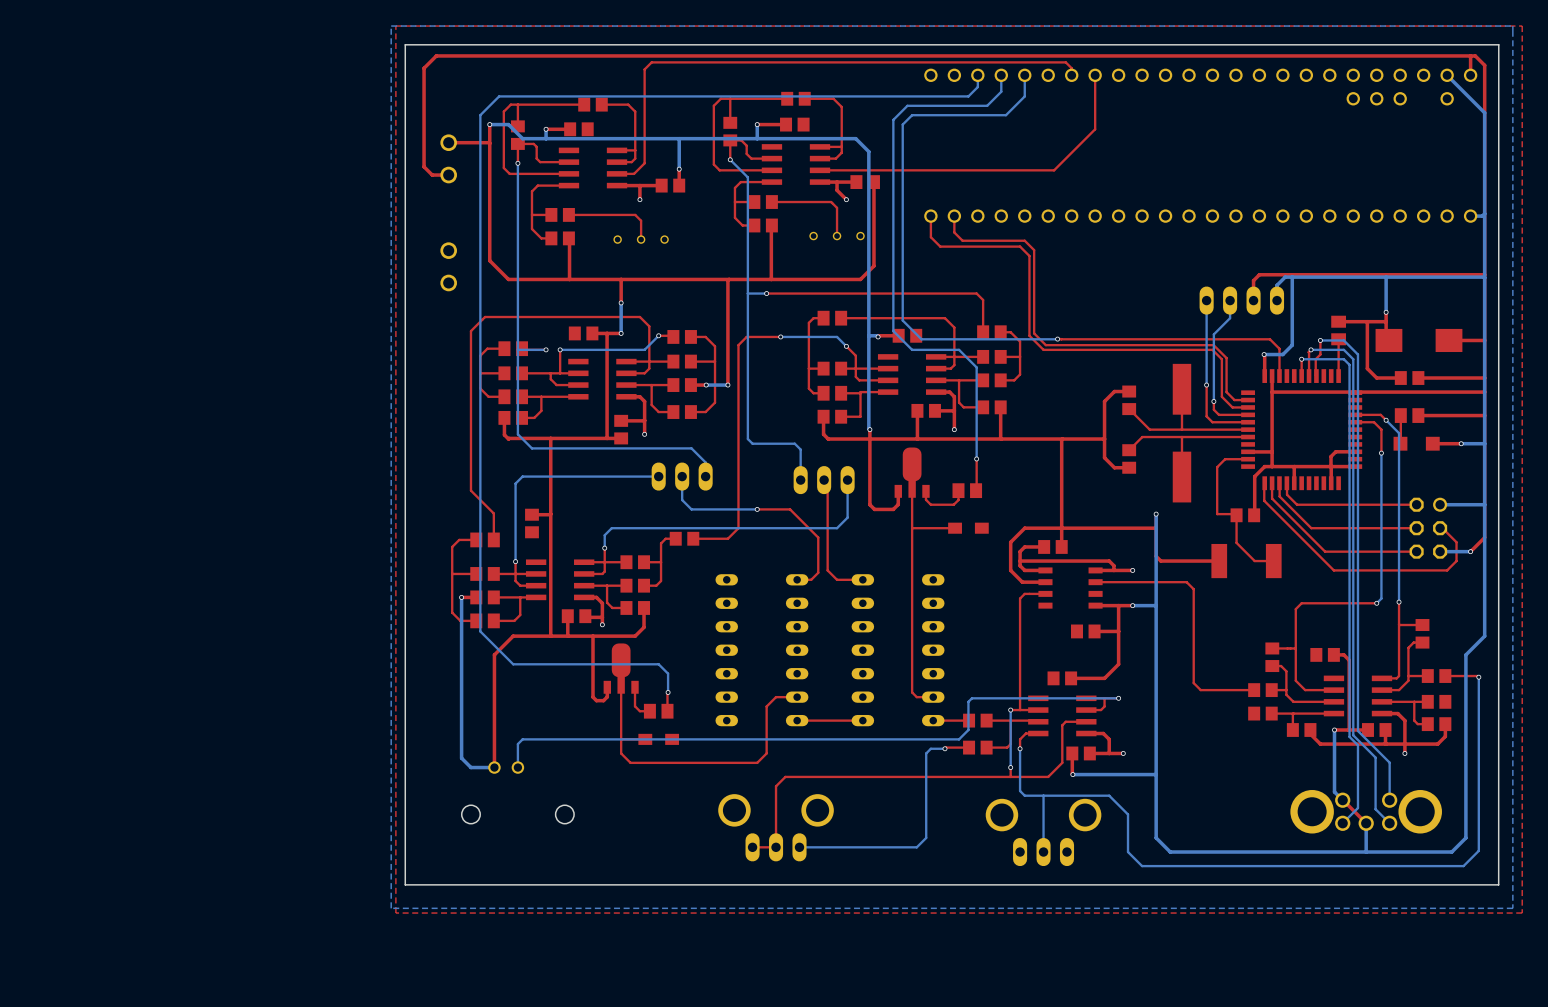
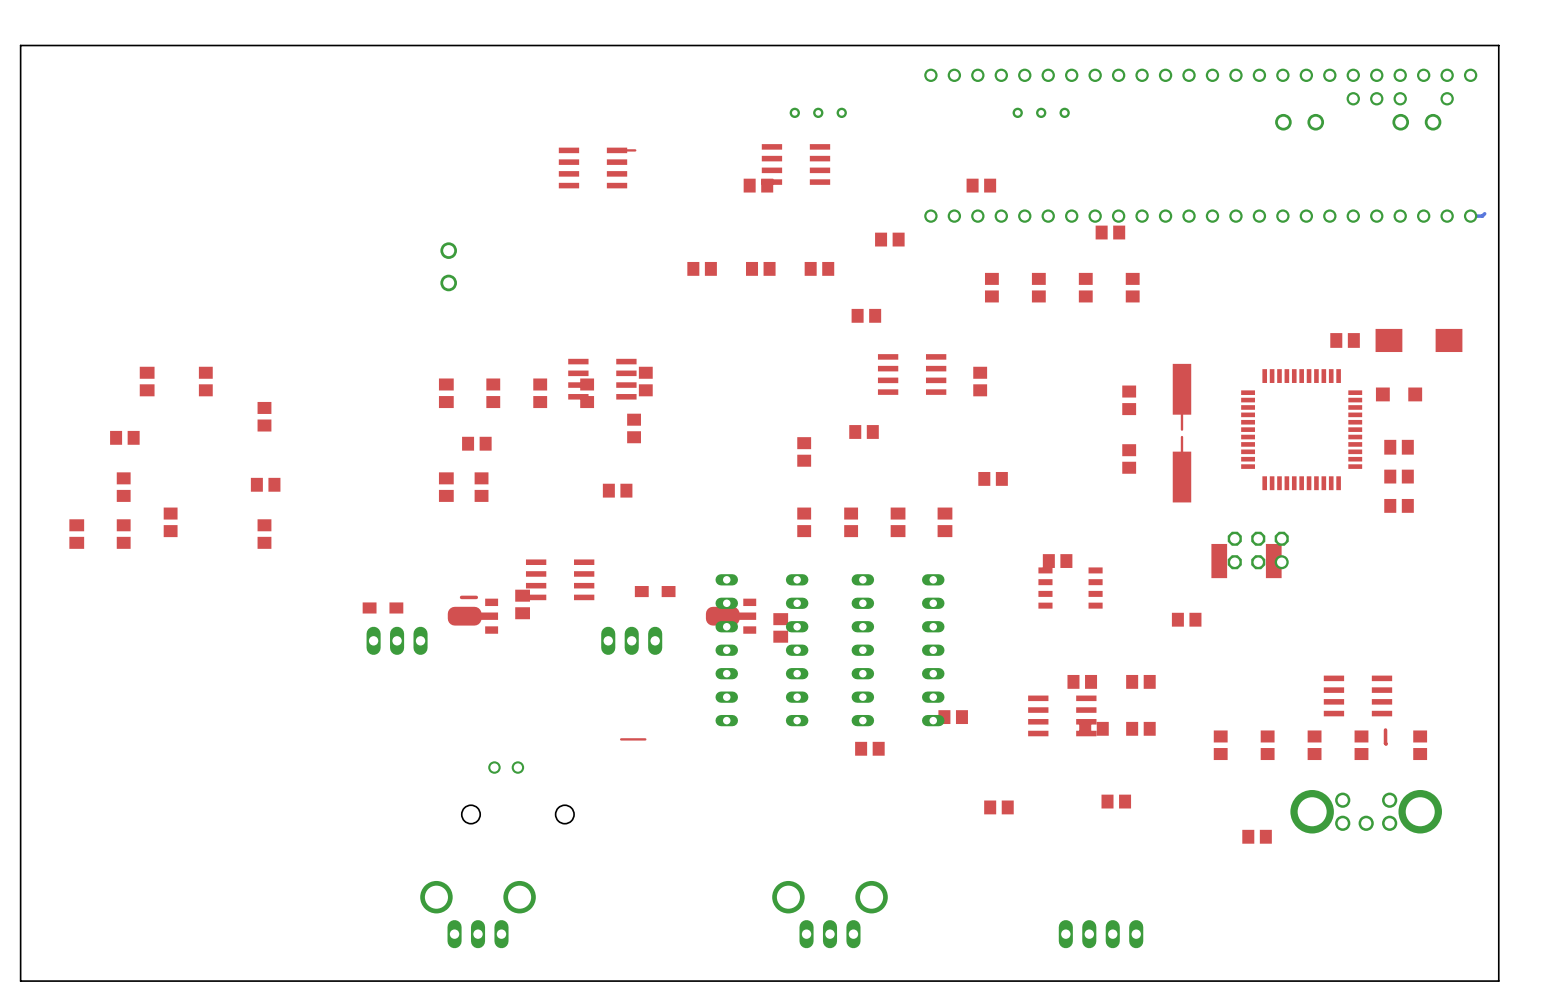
bottom zone outline: (1512, 26) (1512, 908) (391, 908) (391, 26) (1512, 26) -> none
top zone outline: (1522, 26) (395, 26) (395, 913) (1522, 913) (1522, 26) -> none
board edge: (1498, 44) (405, 44) (405, 884) (1498, 884) (1498, 44) -> (1498, 45) (1498, 981) (20, 981) (20, 45) (1498, 45)
top track: (1470, 55) (1470, 75) -> none
bottom track: (977, 75) (977, 87) (968, 96) (499, 96) (480, 115) (480, 631) (513, 664) (658, 664) (668, 673) (668, 692) -> none
bottom track: (1001, 75) (1001, 91) (987, 105) (907, 105) (893, 119) (893, 331) (912, 349) (959, 349) (976, 367) (976, 458) -> none
bottom track: (1024, 75) (1024, 96) (1005, 115) (912, 115) (902, 124) (902, 320) (921, 339) (1057, 339) -> none
top track: (1071, 75) (1071, 68) (1065, 62) (651, 62) (644, 69) (644, 163) (634, 173) (617, 173) -> none
top track: (1095, 75) (1095, 129) (1054, 170) (819, 170) -> none
bottom track: (1447, 75) (1484, 112) (1484, 636) (1465, 654) (1465, 837) (1451, 852) (1170, 852) (1156, 837) (1156, 514) -> none
top track: (730, 98) (730, 122) -> none
top track: (787, 98) (720, 98) (713, 105) (713, 164) (719, 170) (771, 170) -> none
part: (795, 98) -> none
top track: (804, 98) (833, 98) (841, 106) (841, 152) (835, 158) (819, 158) -> none
top track: (517, 104) (517, 126) -> none
top track: (584, 104) (510, 104) (503, 111) (503, 168) (509, 173) (568, 173) -> none
part: (593, 104) -> none
top track: (601, 104) (628, 104) (635, 111) (635, 158) (631, 162) (617, 162) -> none
part: none -> (818, 112)
part: none -> (1041, 112)
part: none -> (1299, 122)
part: none -> (1416, 122)
top track: (489, 124) (489, 260) (508, 279) (860, 279) (873, 265) (873, 182) -> none
bottom track: (489, 124) (508, 124) (522, 138) (855, 138) (868, 151) (869, 429) -> none
via: (489, 124) -> none
bottom track: (757, 124) (757, 138) -> none
via: (757, 124) -> none
top track: (786, 124) (757, 124) -> none
part: (794, 124) -> none
bottom track: (546, 129) (546, 138) -> none
via: (546, 129) -> none
top track: (570, 129) (546, 129) -> none
part: (578, 129) -> none
part: (730, 131) -> none
part: (517, 135) -> none
bottom track: (679, 138) (679, 169) -> none
top track: (448, 142) (489, 143) -> none
top track: (841, 146) (819, 146) -> none
part: (448, 158) -> none
top track: (771, 158) (751, 158) (746, 153) (746, 145) (741, 140) (730, 140) (730, 159) -> none
bottom track: (730, 159) (747, 177) (747, 439) (752, 443) (794, 443) (800, 449) (800, 480) -> none
via: (730, 159) -> none
top track: (568, 162) (540, 162) (536, 158) (536, 146) (533, 143) (517, 143) (517, 163) -> none
bottom track: (517, 163) (517, 434) (531, 448) (691, 448) (705, 462) (705, 476) -> none
via: (517, 163) -> none
top track: (679, 169) (679, 185) -> none
via: (679, 169) -> none
top track: (448, 175) (432, 175) (424, 166) (424, 68) (436, 55) (1475, 55) (1484, 65) (1484, 537) (1470, 551) -> none
top track: (771, 182) (740, 182) (734, 187) (734, 217) (742, 225) (754, 225) -> none
top track: (837, 182) (837, 190) (846, 199) -> none
top track: (856, 182) (819, 182) -> none
part: (865, 182) -> none
top track: (568, 185) (537, 185) (531, 191) (531, 229) (541, 238) (551, 238) -> none
top track: (639, 185) (639, 199) -> none
top track: (661, 185) (617, 185) -> none
part: (670, 185) -> none
part: none -> (981, 185)
via: (639, 199) -> none
via: (846, 199) -> none
top track: (754, 202) (734, 202) -> none
part position: (763, 202) -> (758, 185)
top track: (771, 202) (831, 202) (837, 207) (837, 236) -> none
top track: (551, 214) (531, 214) -> none
part: (560, 214) -> none
top track: (568, 214) (635, 214) (641, 220) (641, 239) -> none
top track: (930, 216) (930, 237) (940, 246) (1020, 246) (1029, 255) (1029, 335) (1043, 349) (1212, 349) (1221, 359) (1221, 396) (1232, 407) (1248, 407) -> none
top track: (954, 216) (954, 232) (962, 240) (1024, 240) (1034, 250) (1034, 333) (1045, 345) (1213, 345) (1226, 358) (1226, 392) (1234, 400) (1248, 400) -> none
part: (763, 225) -> none
top track: (771, 225) (771, 279) -> none
part: none -> (1110, 232)
part: (837, 236) -> none
part: (560, 238) -> none
top track: (568, 238) (569, 279) -> none
part: (641, 239) -> none
part: none -> (889, 239)
part: none -> (702, 268)
part: none -> (760, 268)
part: none -> (819, 268)
top track: (1484, 274) (1259, 274) (1253, 280) (1253, 300) -> none
bottom track: (1292, 277) (1292, 345) (1282, 354) (1264, 354) -> none
bottom track: (1386, 277) (1386, 312) -> none
bottom track: (1484, 277) (1285, 277) (1277, 285) (1277, 300) -> none
top track: (621, 279) (621, 302) -> none
top track: (729, 279) (727, 385) -> none
part: none -> (991, 287)
part: none -> (1038, 287)
part: none -> (1085, 287)
part: none -> (1132, 287)
top track: (766, 293) (976, 293) (983, 300) (983, 332) -> none
bottom track: (766, 293) (747, 293) -> none
via: (766, 293) -> none
bottom track: (1206, 300) (1206, 385) -> none
bottom track: (1230, 300) (1230, 318) (1213, 334) (1213, 401) -> none
part: (1241, 300) -> none
bottom track: (621, 302) (621, 333) -> none
via: (621, 302) -> none
top track: (1386, 312) (1386, 337) (1388, 340) -> none
via: (1386, 312) -> none
part: none -> (866, 315)
top track: (823, 318) (813, 318) (808, 322) (808, 388) (813, 393) (823, 393) -> none
part: (832, 318) -> none
top track: (841, 318) (944, 318) (954, 327) (954, 365) (950, 368) (936, 368) -> none
top track: (1367, 321) (1367, 368) (1376, 378) (1400, 378) -> none
top track: (1386, 321) (1338, 321) -> none
part rotation: 0° (1338, 330) -> 90° clockwise (1345, 340)
part: (991, 332) -> none
top track: (1000, 332) (1010, 332) (1020, 341) (1020, 374) (1014, 380) (1000, 380) -> none
part: (583, 333) -> none
top track: (607, 333) (607, 438) -> none
top track: (621, 333) (592, 333) -> none
via: (621, 333) -> none
top track: (658, 335) (673, 336) -> none
bottom track: (658, 335) (644, 349) (560, 349) -> none
via: (658, 335) -> none
bottom track: (868, 335) (878, 336) -> none
top track: (898, 335) (878, 336) -> none
part: (907, 335) -> none
part: (682, 336) -> none
top track: (690, 336) (705, 336) (715, 346) (715, 402) (705, 412) (690, 412) -> none
top track: (780, 336) (746, 336) (738, 345) (738, 528) (727, 538) (693, 538) -> none
bottom track: (780, 336) (837, 336) (846, 346) -> none
via: (780, 336) -> none
via: (878, 336) -> none
top track: (1057, 339) (1269, 339) (1279, 348) (1279, 376) -> none
via: (1057, 339) -> none
top track: (1338, 339) (1338, 376) -> none
top track: (1320, 340) (1320, 354) (1315, 359) (1316, 376) -> none
bottom track: (1320, 340) (1343, 340) (1357, 354) (1357, 730) (1389, 762) (1389, 800) -> none
via: (1320, 340) -> none
top track: (1484, 340) (1449, 340) -> none
top track: (846, 346) (855, 355) (855, 376) (859, 380) (888, 380) -> none
via: (846, 346) -> none
top track: (504, 348) (487, 348) (480, 355) (480, 388) (488, 396) (504, 396) -> none
part: (513, 348) -> none
bottom track: (546, 349) (517, 349) -> none
via: (546, 349) -> none
top track: (560, 349) (560, 373) -> none
via: (560, 349) -> none
top track: (1311, 349) (1308, 352) (1309, 376) -> none
bottom track: (1311, 349) (1343, 349) (1353, 359) (1353, 735) (1375, 757) (1375, 809) (1389, 823) -> none
via: (1311, 349) -> none
top track: (1264, 354) (1264, 376) -> none
via: (1264, 354) -> none
top track: (983, 356) (936, 356) -> none
part: (991, 356) -> none
top track: (1020, 356) (1000, 356) -> none
top track: (1301, 359) (1301, 376) -> none
bottom track: (1301, 359) (1343, 359) (1349, 364) (1349, 736) (1357, 745) (1357, 808) (1342, 823) -> none
via: (1301, 359) -> none
top track: (673, 361) (626, 361) -> none
part: (682, 361) -> none
top track: (715, 361) (690, 361) -> none
top track: (823, 368) (808, 368) -> none
part: (832, 368) -> none
top track: (888, 368) (841, 368) -> none
top track: (504, 373) (480, 373) -> none
part: (513, 373) -> none
top track: (550, 373) (550, 379) (556, 385) (578, 385) -> none
top track: (578, 373) (521, 373) -> none
top track: (626, 373) (644, 373) (649, 368) (649, 326) (639, 317) (485, 317) (470, 331) (470, 490) (493, 513) (493, 539) -> none
top track: (1272, 376) (1272, 466) -> none
part: (1409, 378) -> none
top track: (1484, 378) (1418, 378) -> none
top track: (959, 380) (959, 402) (963, 407) (983, 407) -> none
top track: (983, 380) (936, 380) -> none
part rotation: 0° (991, 380) -> 90° clockwise (980, 381)
part: none -> (147, 381)
part: none -> (205, 381)
part: none -> (645, 381)
top track: (651, 385) (651, 405) (658, 412) (673, 412) -> none
top track: (673, 385) (626, 385) -> none
part: (682, 385) -> none
top track: (706, 385) (690, 385) -> none
via: (706, 385) -> none
bottom track: (727, 385) (706, 385) -> none
via: (727, 385) -> none
top track: (1206, 385) (1206, 416) (1212, 422) (1248, 422) -> none
via: (1206, 385) -> none
top track: (1129, 391) (1114, 391) (1104, 401) (1104, 457) (1114, 467) (1129, 467) -> none
top track: (888, 392) (860, 392) (860, 416) (841, 416) -> none
top track: (936, 392) (949, 392) (954, 396) (954, 429) -> none
top track: (1484, 392) (1272, 392) -> none
part: none -> (446, 393)
part: none -> (493, 393)
part: none -> (540, 393)
part: none -> (587, 393)
part: (832, 393) -> none
top track: (860, 393) (841, 393) -> none
part: (513, 396) -> none
top track: (541, 396) (541, 410) (534, 417) (521, 417) -> none
top track: (578, 396) (521, 396) -> none
top track: (626, 396) (639, 396) (644, 401) (644, 434) -> none
top track: (1213, 401) (1213, 409) (1218, 414) (1248, 414) -> none
via: (1213, 401) -> none
part: (991, 407) -> none
top track: (1000, 407) (1001, 439) -> none
top track: (1129, 409) (1149, 429) (1248, 429) -> none
top track: (917, 410) (917, 439) -> none
part: (926, 410) -> none
top track: (954, 410) (934, 410) -> none
part: (682, 412) -> none
top track: (1355, 414) (1380, 414) (1386, 420) -> none
top track: (1400, 415) (1400, 443) -> none
part position: (1409, 415) -> (1399, 447)
top track: (1484, 415) (1418, 415) -> none
part: none -> (264, 416)
top track: (823, 416) (823, 434) (828, 439) (1104, 439) -> none
part: (832, 416) -> none
top track: (504, 417) (504, 434) (508, 439) (621, 438) -> none
part: (513, 417) -> none
top track: (644, 420) (621, 420) -> none
bottom track: (1386, 420) (1399, 433) (1399, 602) -> none
via: (1386, 420) -> none
top track: (1355, 422) (1374, 422) (1381, 429) (1381, 453) -> none
part position: (621, 429) -> (634, 428)
top track: (869, 429) (869, 504) (874, 509) (893, 509) (898, 504) (898, 491) -> none
via: (869, 429) -> none
via: (954, 429) -> none
part: none -> (864, 431)
via: (644, 434) -> none
part: none -> (124, 437)
top track: (1248, 437) (1142, 437) (1129, 450) -> none
top track: (550, 438) (550, 636) -> none
top track: (1062, 439) (1061, 546) -> none
part: none -> (476, 443)
part position: (1416, 443) -> (1399, 394)
top track: (1461, 443) (1432, 443) -> none
via: (1461, 443) -> none
bottom track: (1484, 443) (1461, 443) -> none
part: none -> (804, 451)
top track: (1272, 451) (1248, 451) -> none
top track: (1355, 451) (1335, 451) (1330, 456) (1331, 483) -> none
bottom track: (1381, 453) (1381, 598) (1376, 603) -> none
via: (1381, 453) -> none
top track: (976, 458) (976, 490) -> none
via: (976, 458) -> none
top track: (1248, 459) (1225, 459) (1217, 467) (1217, 514) (1236, 515) (1236, 542) (1254, 561) (1273, 561) -> none
top track: (1294, 466) (1294, 483) -> none
top track: (1355, 466) (1264, 466) (1254, 476) (1254, 515) -> none
part: (912, 472) -> none
bottom track: (658, 476) (522, 476) (515, 483) (515, 561) -> none
bottom track: (682, 476) (682, 500) (691, 509) (757, 509) -> none
part: (682, 476) -> none
part: none -> (1399, 476)
part: none -> (993, 478)
top track: (824, 480) (827, 483) (827, 570) (837, 579) (862, 579) -> none
part: (824, 480) -> none
bottom track: (847, 480) (847, 517) (837, 528) (611, 528) (604, 535) (604, 548) -> none
top track: (1264, 483) (1264, 500) (1333, 570) (1447, 570) (1456, 561) (1456, 542) (1442, 528) (1440, 528) -> none
top track: (1272, 483) (1272, 498) (1325, 551) (1416, 551) -> none
top track: (1279, 483) (1279, 496) (1311, 528) (1416, 528) -> none
top track: (1286, 483) (1287, 494) (1297, 504) (1416, 504) -> none
part: none -> (265, 484)
part: none -> (123, 487)
part: none -> (446, 487)
part: none -> (481, 487)
top track: (912, 489) (912, 692) (916, 697) (933, 697) -> none
part: none -> (617, 490)
top track: (958, 490) (958, 500) (953, 504) (930, 504) (925, 499) (925, 491) -> none
part: (967, 490) -> none
bottom track: (1484, 504) (1440, 504) -> none
part: none -> (1399, 505)
top track: (757, 509) (790, 509) (818, 537) (818, 572) (811, 579) (797, 579) -> none
via: (757, 509) -> none
top track: (550, 514) (531, 514) -> none
top track: (1156, 514) (1156, 556) (1160, 561) (1219, 561) -> none
via: (1156, 514) -> none
part: (1245, 515) -> none
part: none -> (170, 522)
part: none -> (804, 522)
part: none -> (851, 522)
part: none -> (898, 522)
part: none -> (944, 522)
part: (531, 523) -> none
top track: (955, 528) (912, 528) -> none
part: (968, 528) -> none
top track: (1156, 528) (1024, 528) (1010, 542) (1010, 570) (1022, 582) (1045, 582) -> none
part rotation: 0° (1428, 528) -> 90° clockwise (1258, 550)
part position: (1428, 528) -> (1258, 550)
part: none -> (76, 534)
part: none -> (123, 534)
part: none -> (264, 534)
top track: (675, 538) (665, 538) (661, 543) (661, 580) (656, 585) (644, 585) -> none
part: (684, 538) -> none
top track: (476, 539) (459, 539) (452, 546) (452, 612) (460, 620) (476, 620) -> none
part: (485, 539) -> none
top track: (1044, 546) (1024, 546) (1020, 551) (1020, 565) (1024, 570) (1045, 570) -> none
part position: (1052, 546) -> (1057, 561)
top track: (604, 548) (604, 571) (602, 573) (584, 573) -> none
via: (604, 548) -> none
bottom track: (1470, 551) (1440, 551) -> none
via: (1470, 551) -> none
top track: (515, 561) (515, 580) (520, 585) (536, 585) -> none
via: (515, 561) -> none
top track: (1020, 561) (1109, 561) (1113, 565) (1113, 570) -> none
top track: (626, 562) (584, 562) -> none
part: (635, 562) -> none
top track: (661, 562) (644, 562) -> none
top track: (1132, 570) (1095, 570) -> none
via: (1132, 570) -> none
top track: (476, 573) (452, 573) -> none
part: (485, 573) -> none
top track: (536, 573) (493, 573) -> none
top track: (1095, 582) (1186, 582) (1193, 589) (1193, 683) (1200, 690) (1254, 690) -> none
top track: (607, 585) (607, 602) (612, 607) (626, 607) -> none
top track: (626, 585) (584, 585) -> none
part: (635, 585) -> none
top track: (1045, 593) (1024, 593) (1020, 598) (1020, 710) -> none
bottom track: (461, 597) (461, 758) (470, 767) (494, 767) -> none
via: (461, 597) -> none
part: (485, 597) -> none
top track: (520, 597) (520, 615) (514, 620) (493, 620) -> none
top track: (536, 597) (493, 597) -> none
top track: (584, 597) (596, 597) (602, 603) (602, 624) -> none
top track: (1399, 602) (1399, 676) (1396, 678) (1381, 678) -> none
via: (1399, 602) -> none
top track: (1376, 603) (1301, 603) (1295, 609) (1295, 680) (1305, 690) (1333, 690) -> none
via: (1376, 603) -> none
part: none -> (522, 604)
top track: (1118, 605) (1118, 664) (1104, 678) (1071, 678) -> none
top track: (1132, 605) (1095, 605) -> none
via: (1132, 605) -> none
bottom track: (1156, 605) (1132, 605) -> none
part: none -> (382, 607)
part: (635, 607) -> none
top track: (644, 607) (644, 627) (635, 636) (513, 636) (494, 654) (494, 767) -> none
part: none -> (472, 616)
top track: (567, 616) (568, 636) -> none
part: (576, 616) -> none
top track: (585, 616) (602, 617) -> none
part: none -> (731, 616)
part: none -> (1186, 619)
part: (485, 620) -> none
via: (602, 624) -> none
top track: (1399, 624) (1422, 625) -> none
part: none -> (780, 627)
part: (1085, 631) -> none
top track: (1118, 631) (1094, 631) -> none
part: (1422, 633) -> none
top track: (593, 636) (593, 697) (596, 700) (603, 700) (607, 696) (607, 687) -> none
part: none -> (397, 640)
part: none -> (631, 640)
top track: (1422, 642) (1413, 642) (1408, 647) (1408, 680) (1399, 690) (1381, 690) -> none
top track: (1272, 648) (1295, 649) -> none
part: (1325, 654) -> none
top track: (1333, 654) (1343, 654) (1349, 660) (1348, 730) -> none
part: (1272, 657) -> none
top track: (1272, 666) (1281, 666) (1286, 671) (1286, 694) (1293, 701) (1333, 701) -> none
part: (621, 668) -> none
top track: (1427, 676) (1408, 676) -> none
part: (1436, 676) -> none
top track: (1445, 676) (1478, 677) -> none
bottom track: (1478, 677) (1478, 850) (1463, 866) (1142, 866) (1128, 852) (1128, 814) (1109, 795) (1024, 795) (1020, 791) (1020, 748) -> none
via: (1478, 677) -> none
part position: (1062, 678) -> (1082, 681)
part: none -> (1140, 681)
top track: (621, 684) (621, 753) (630, 762) (757, 762) (766, 753) (766, 706) (776, 697) (797, 697) -> none
top track: (635, 687) (635, 706) (639, 711) (649, 711) -> none
part: (1262, 690) -> none
top track: (1286, 690) (1271, 690) -> none
top track: (668, 692) (667, 711) -> none
via: (668, 692) -> none
top track: (1104, 698) (1104, 706) (1101, 710) (1086, 710) -> none
bottom track: (1118, 698) (971, 698) (968, 701) (968, 730) (959, 739) (522, 739) (517, 744) (517, 767) -> none
via: (1118, 698) -> none
top track: (1414, 701) (1414, 720) (1417, 724) (1427, 724) -> none
top track: (1427, 701) (1381, 701) -> none
part: (1436, 701) -> none
bottom track: (1010, 710) (1010, 767) -> none
via: (1010, 710) -> none
top track: (1038, 710) (1010, 710) -> none
part: (658, 711) -> none
part: (1262, 713) -> none
top track: (1293, 713) (1292, 730) -> none
top track: (1333, 713) (1271, 713) -> none
top track: (1381, 713) (1397, 713) (1404, 720) (1404, 753) -> none
part: none -> (953, 717)
top track: (862, 720) (797, 720) -> none
top track: (969, 720) (933, 720) -> none
part: (977, 720) -> none
top track: (986, 720) (1038, 721) -> none
top track: (1010, 720) (1010, 744) (1007, 747) (986, 747) -> none
top track: (1086, 721) (1065, 721) (1062, 725) (1062, 762) (1048, 776) (785, 776) (776, 786) (776, 847) (752, 847) -> none
part: (1436, 724) -> none
top track: (1445, 724) (1445, 736) (1437, 744) (1320, 744) (1310, 734) (1310, 730) (1313, 730) -> none
part: none -> (1140, 728)
part: (1301, 730) -> none
bottom track: (1334, 730) (1334, 791) (1342, 800) -> none
via: (1334, 730) -> none
top track: (1367, 730) (1334, 730) -> none
part rotation: 0° (1376, 730) -> 90° clockwise (1361, 745)
part position: (1376, 730) -> (1361, 745)
top track: (1038, 733) (1025, 733) (1020, 739) (1020, 748) -> none
top track: (1086, 733) (1103, 733) (1109, 739) (1109, 753) -> none
part position: (658, 739) -> (655, 591)
part: none -> (1220, 745)
part: none -> (1267, 745)
part: none -> (1314, 745)
part: none -> (1420, 745)
top track: (969, 747) (944, 748) -> none
part: (977, 747) -> none
part: none -> (869, 748)
bottom track: (944, 748) (930, 748) (926, 753) (926, 837) (916, 847) (799, 847) -> none
via: (944, 748) -> none
via: (1020, 748) -> none
top track: (1072, 753) (1072, 774) -> none
part position: (1081, 753) -> (1093, 728)
top track: (1123, 753) (1089, 753) -> none
via: (1123, 753) -> none
via: (1404, 753) -> none
top track: (1010, 767) (1010, 776) -> none
via: (1010, 767) -> none
via: (1072, 774) -> none
bottom track: (1156, 774) (1072, 774) -> none
bottom track: (1043, 795) (1043, 852) -> none
top track: (1342, 800) (1366, 823) -> none
part: none -> (1116, 801)
part: none -> (998, 807)
bottom track: (1366, 823) (1366, 852) -> none
part position: (776, 827) -> (830, 914)
part: (1043, 832) -> none
part: none -> (1257, 836)
part: none -> (478, 914)
part: none -> (1101, 934)

